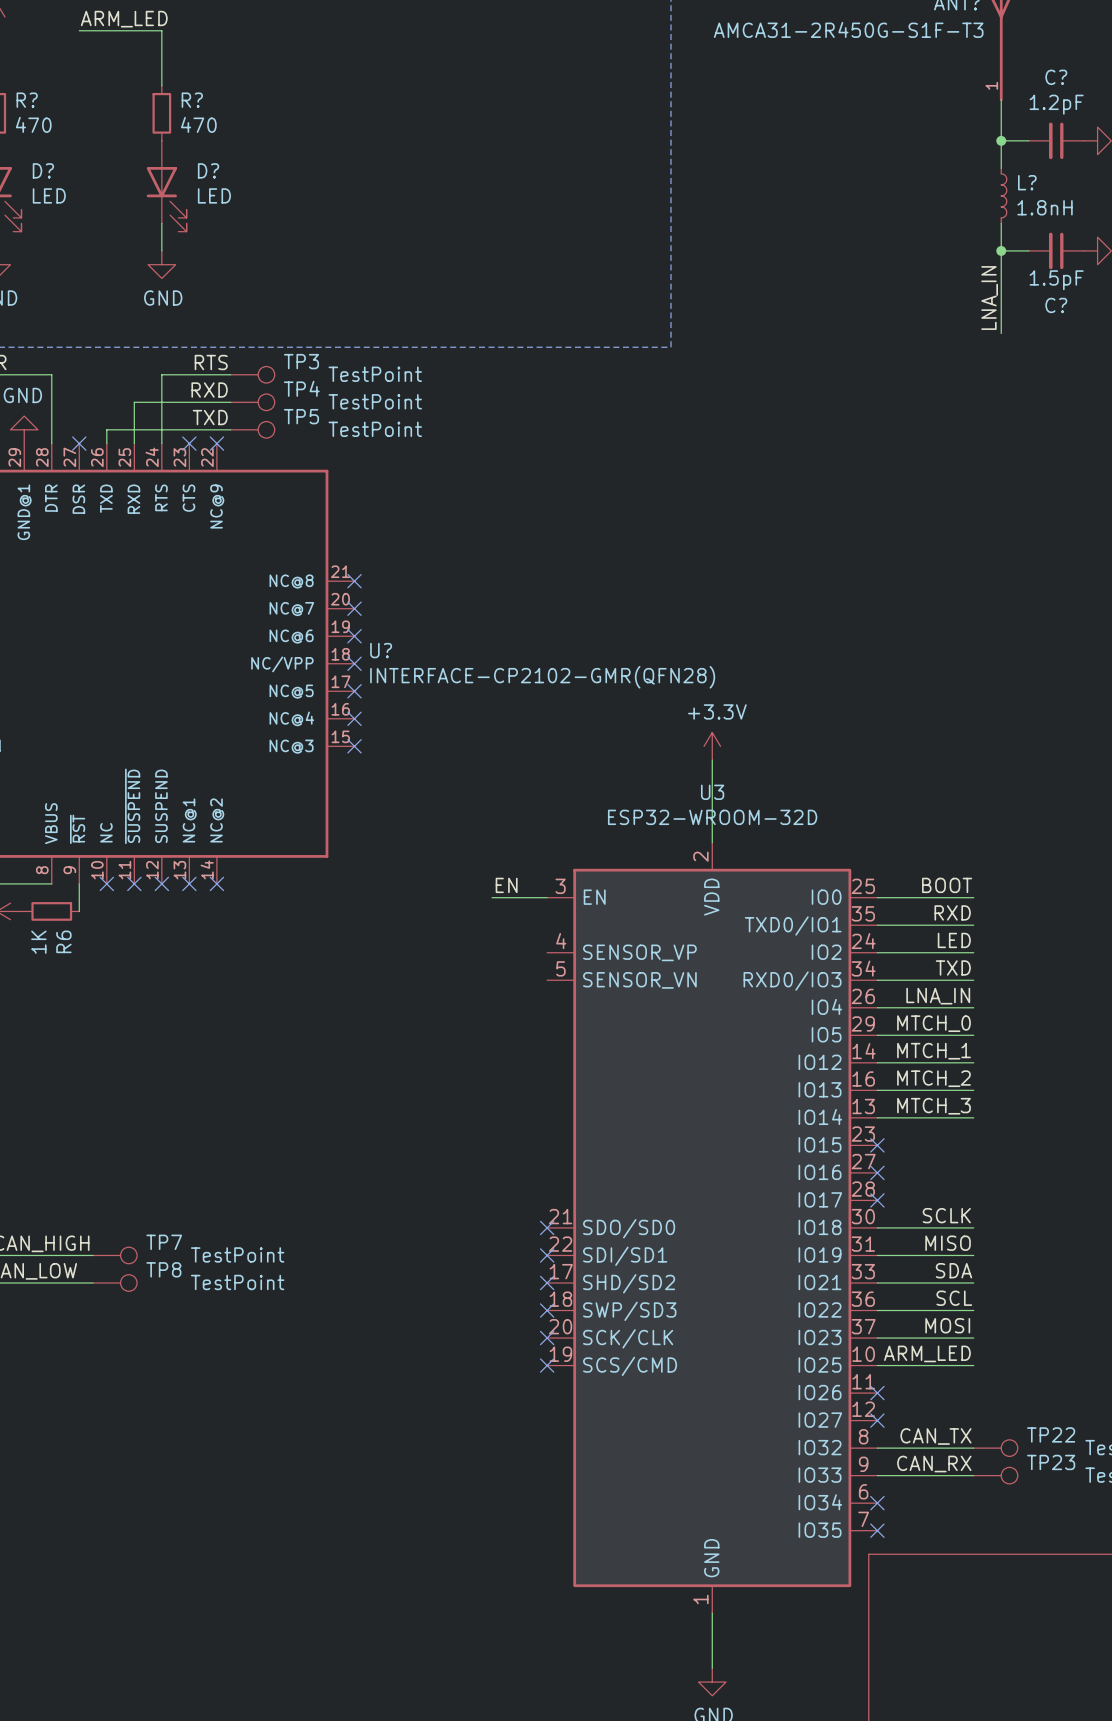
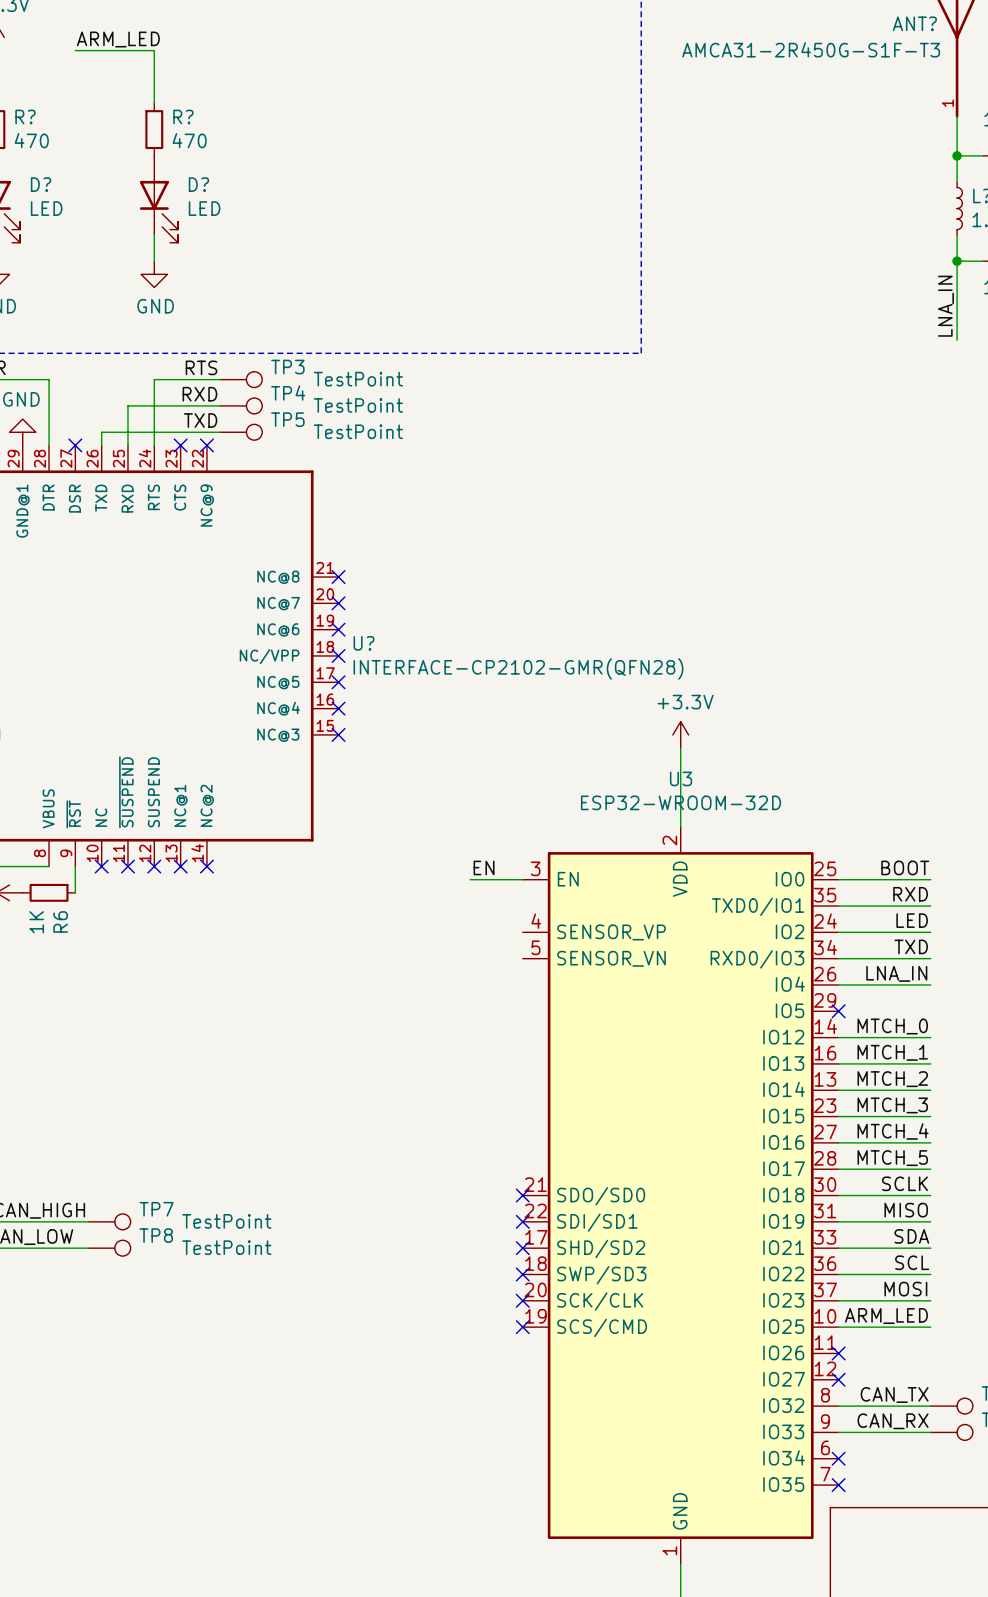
label: MTCH_0 (933, 1023) -> none
wire: (877, 1035) (973, 1035) -> (838, 1116) (930, 1116)
no-connect mark: none -> (838, 1011)
label: MTCH_1 (933, 1051) -> MTCH_0 (892, 1026)
label: MTCH_2 (933, 1078) -> MTCH_1 (892, 1052)
label: MTCH_3 (933, 1106) -> MTCH_2 (892, 1079)
label: none -> MTCH_3 (892, 1105)
no-connect mark: (877, 1145) -> none
label: none -> MTCH_4 (893, 1131)
wire: none -> (838, 1142) (930, 1142)
no-connect mark: (877, 1172) -> none
label: none -> MTCH_5 (892, 1158)
wire: none -> (838, 1169) (930, 1169)
no-connect mark: (877, 1200) -> none

